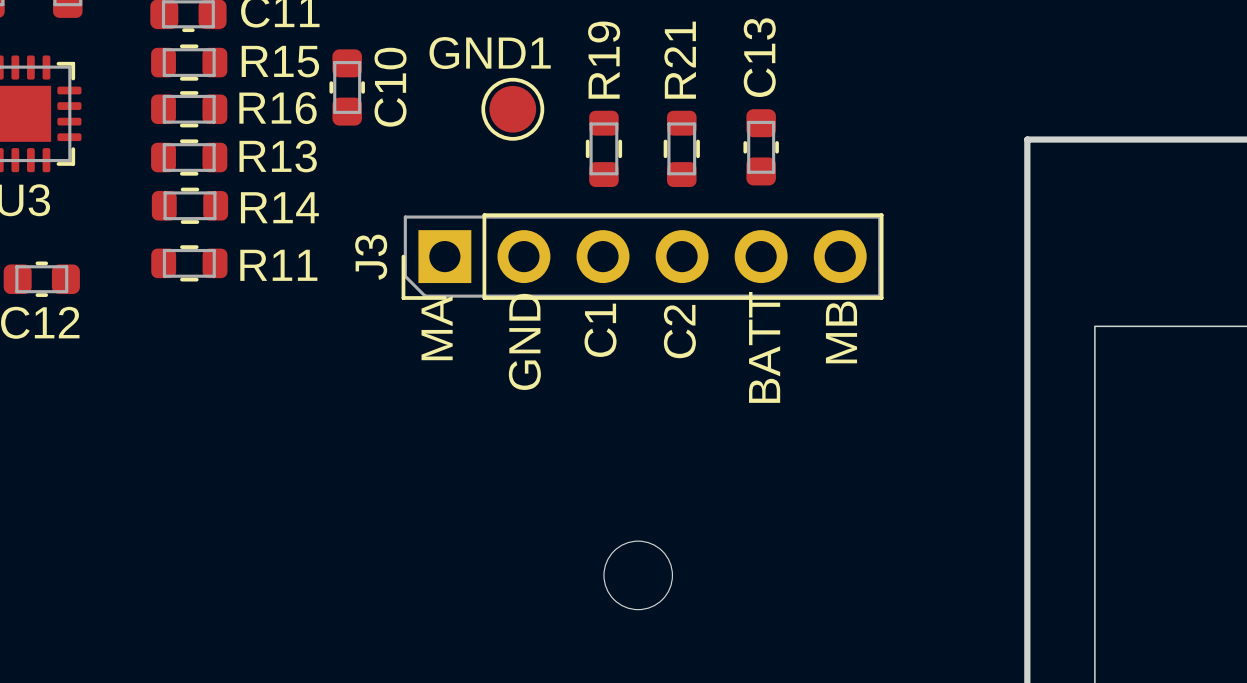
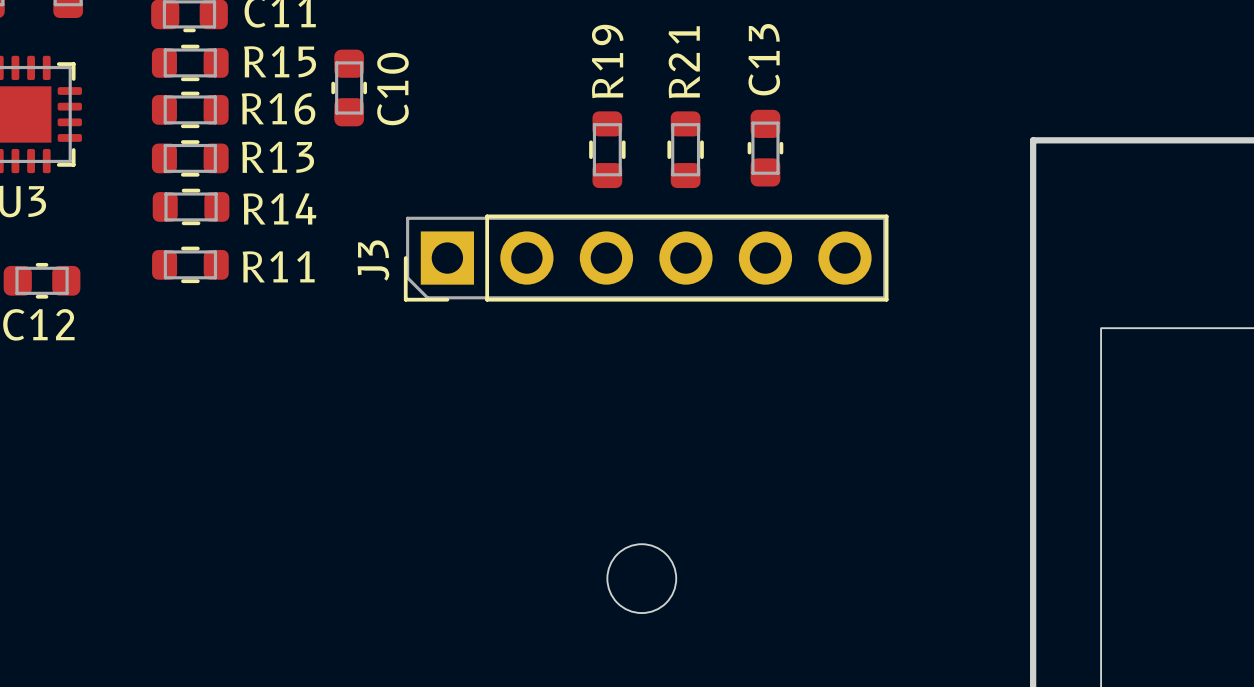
GND1: (512, 109) -> none
text: MA (437, 328) -> none
text: C1 (600, 330) -> none
text: C2 (679, 331) -> none
text: MB (841, 332) -> none
text: GND (524, 341) -> none
text: BATT (764, 347) -> none

